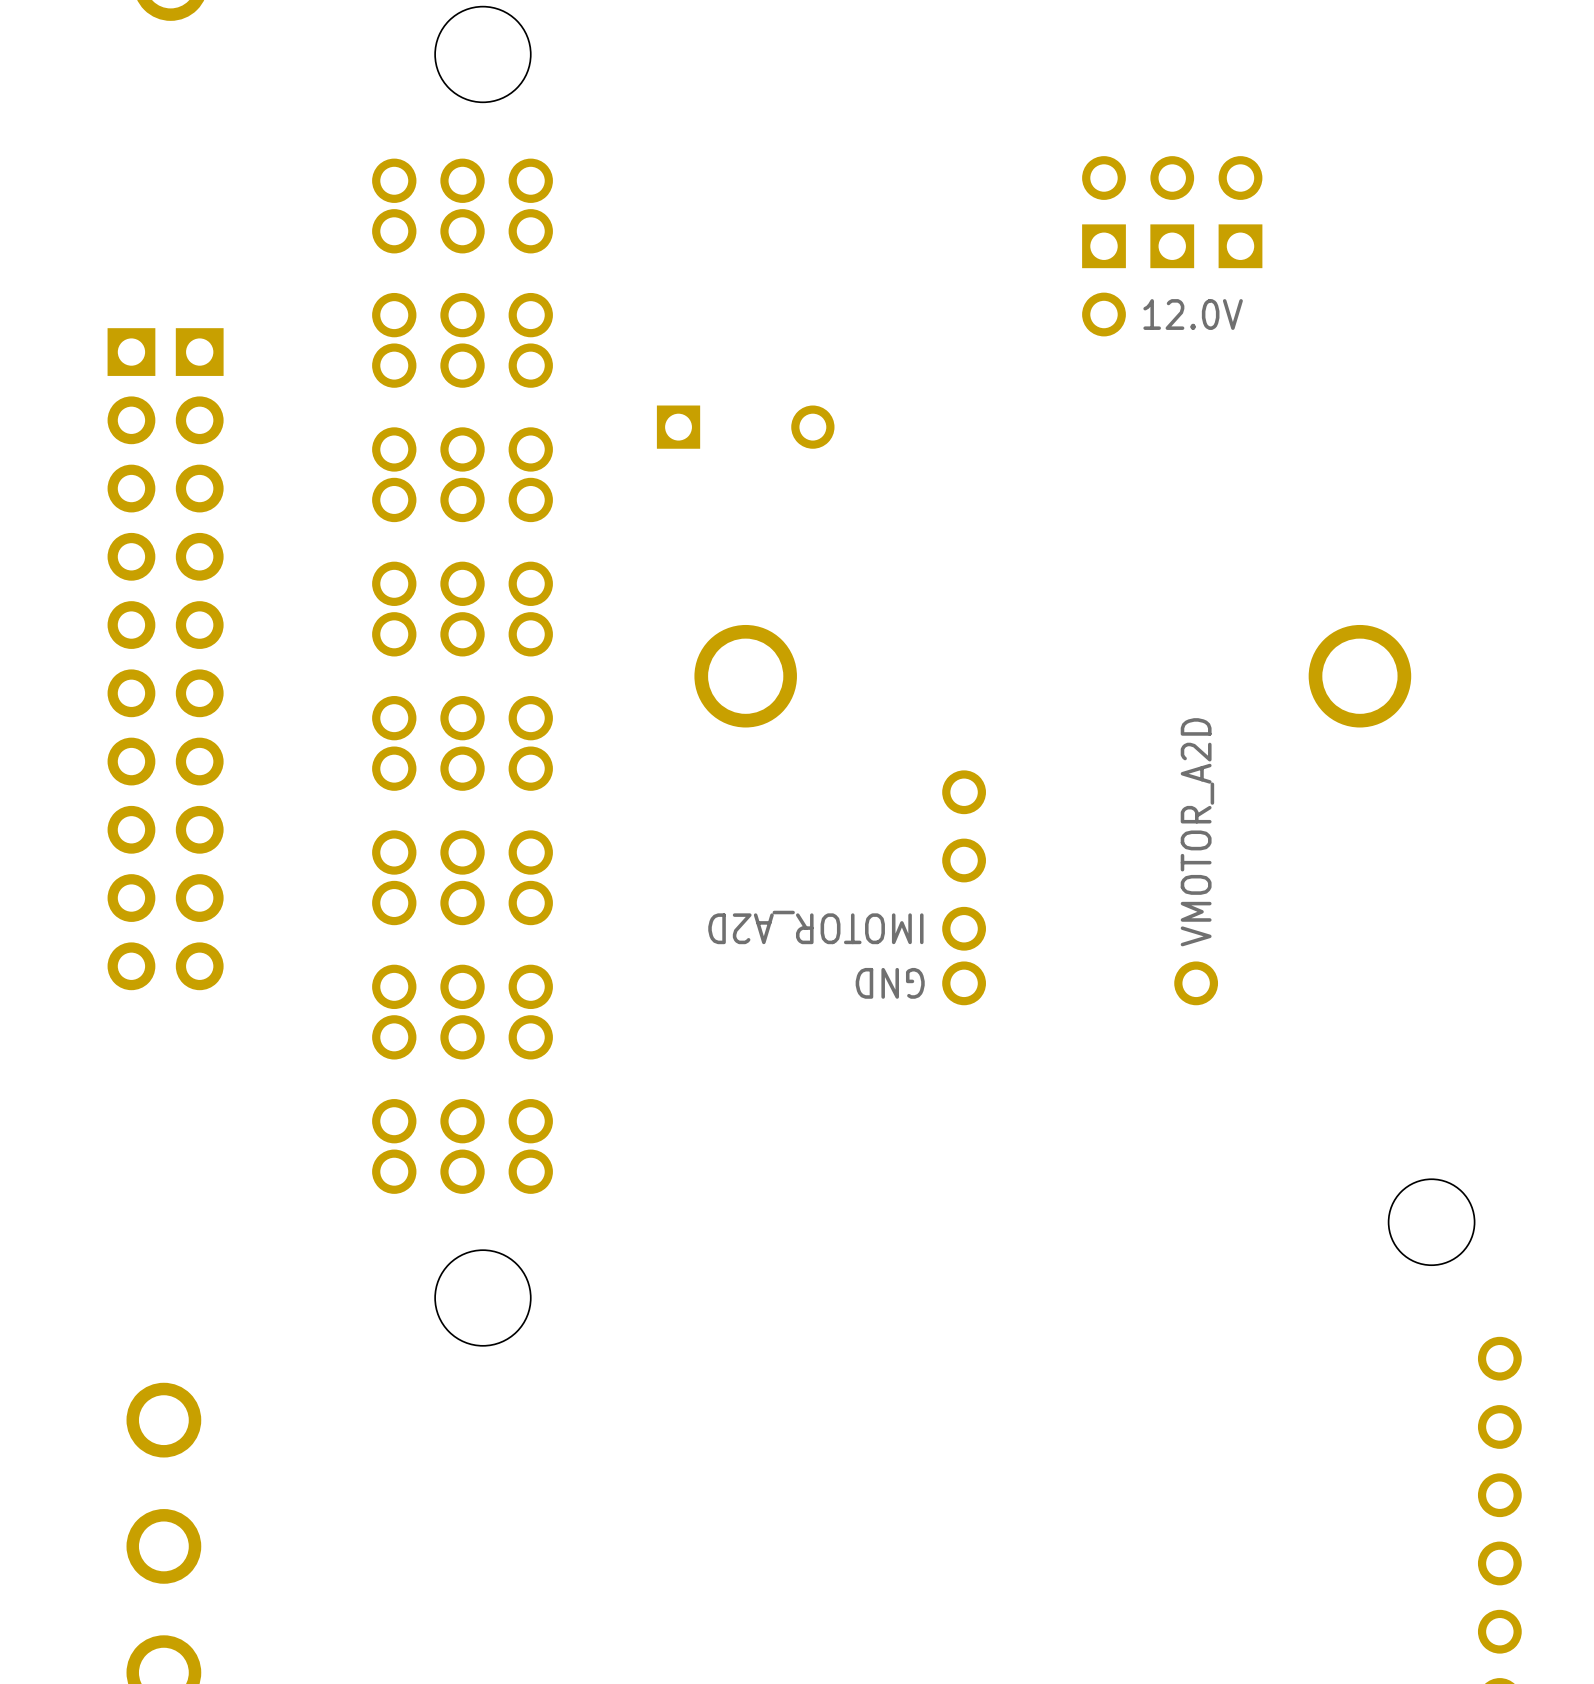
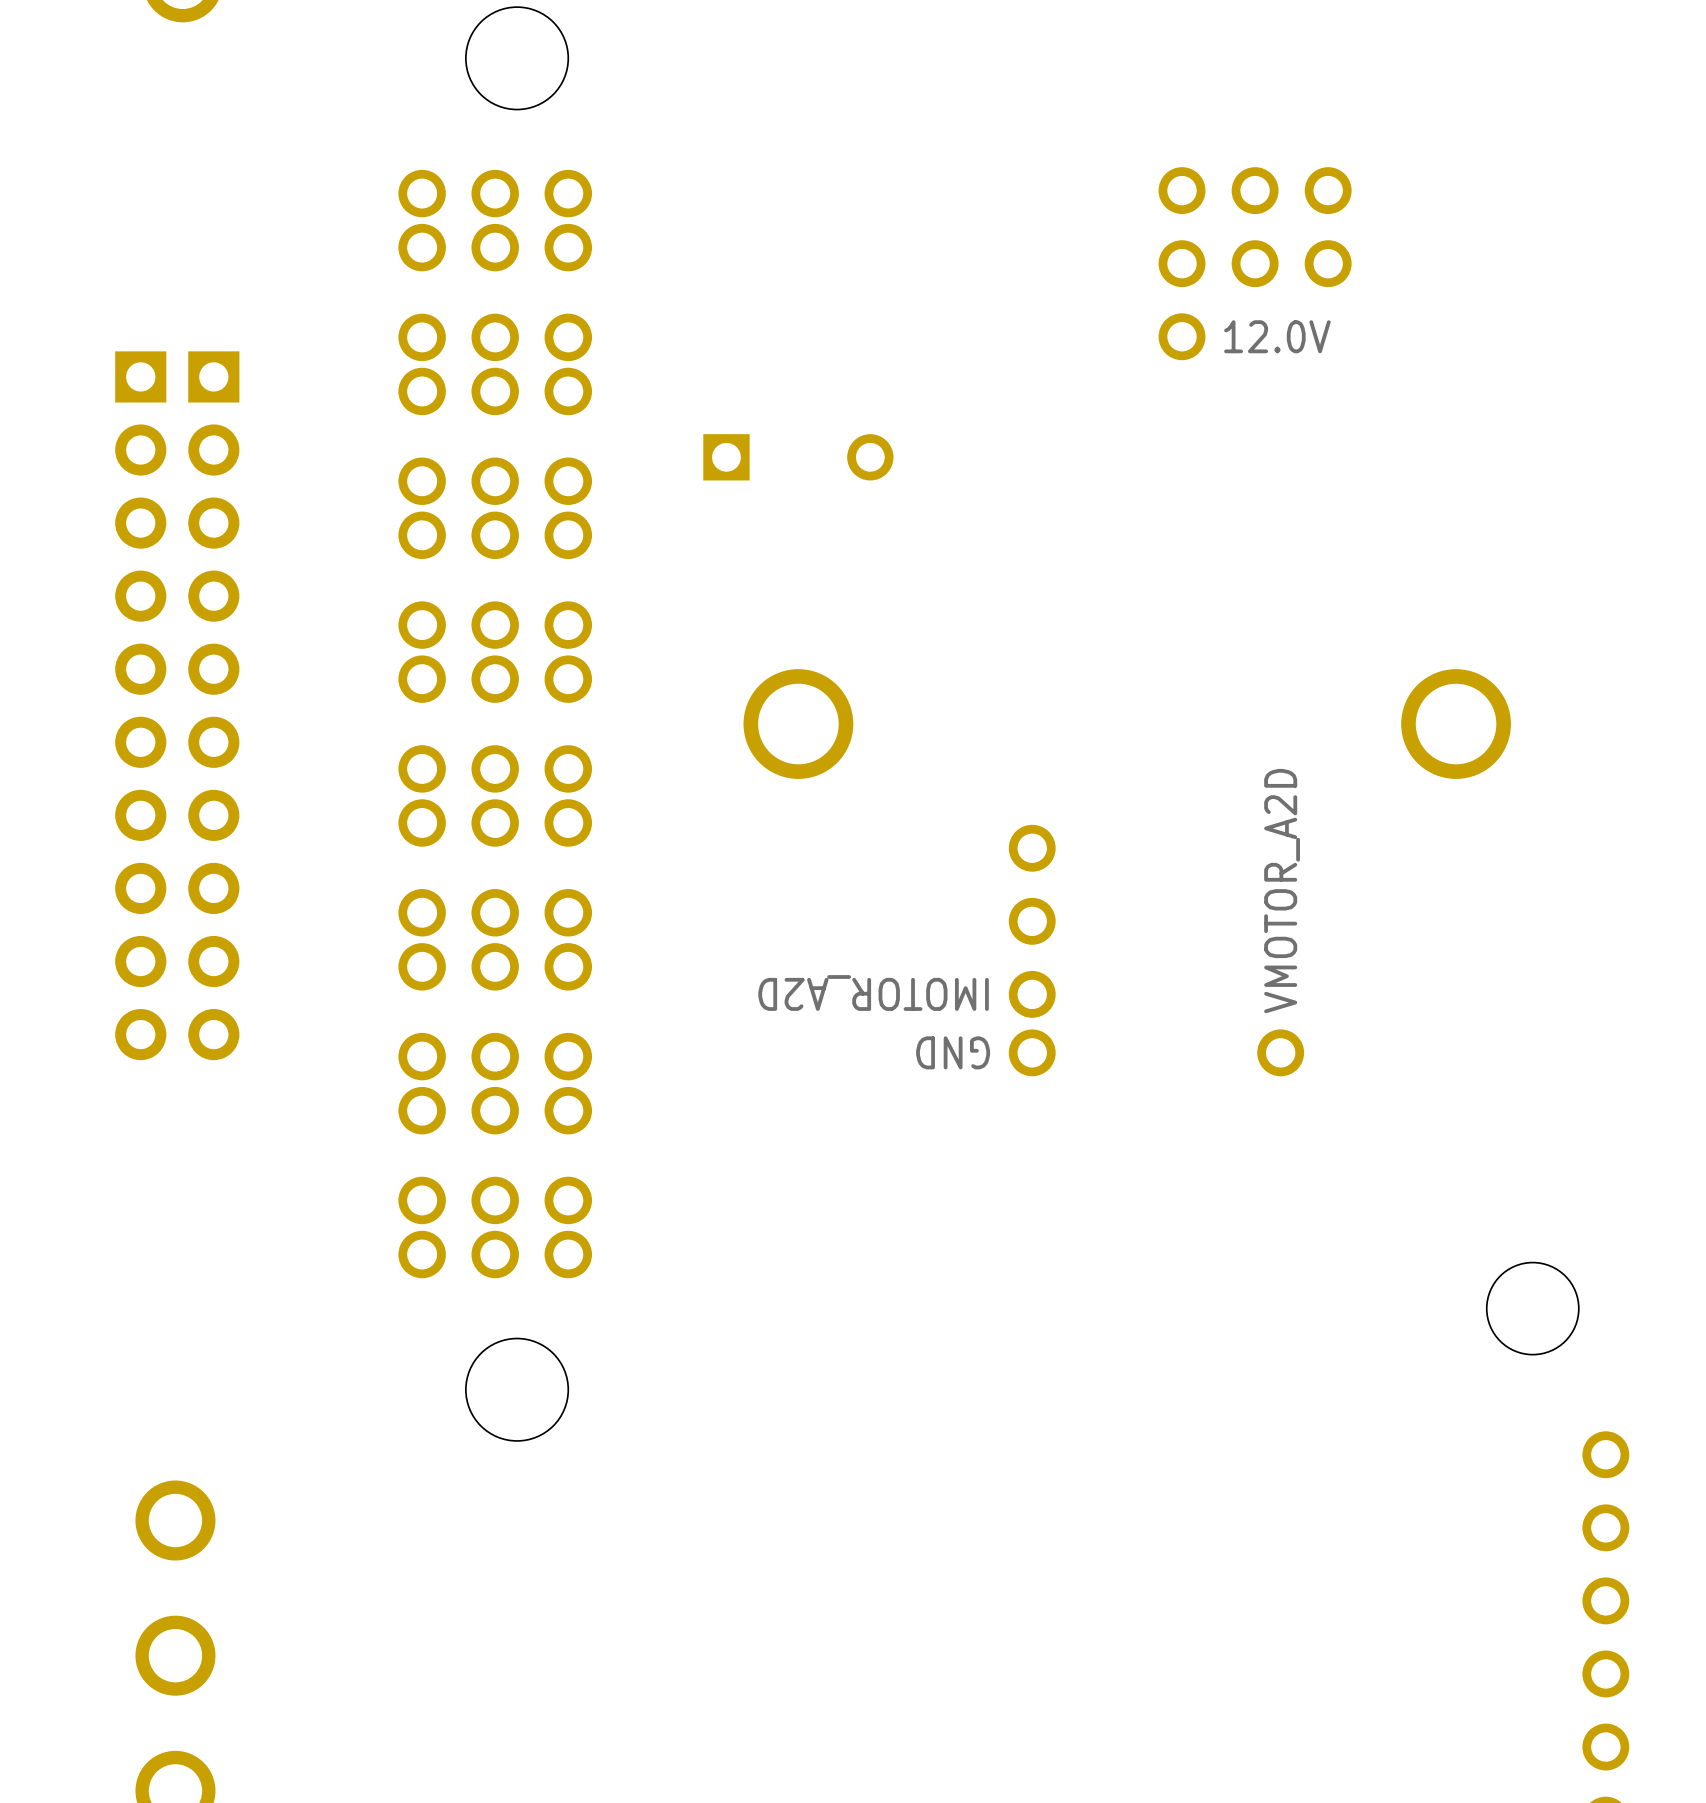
part footprint: [1082, 156, 1126, 269] -> [1158, 167, 1206, 288]
part footprint: [1150, 156, 1195, 269] -> [1231, 167, 1279, 288]
part footprint: [1218, 156, 1263, 269] -> [1304, 167, 1352, 288]

